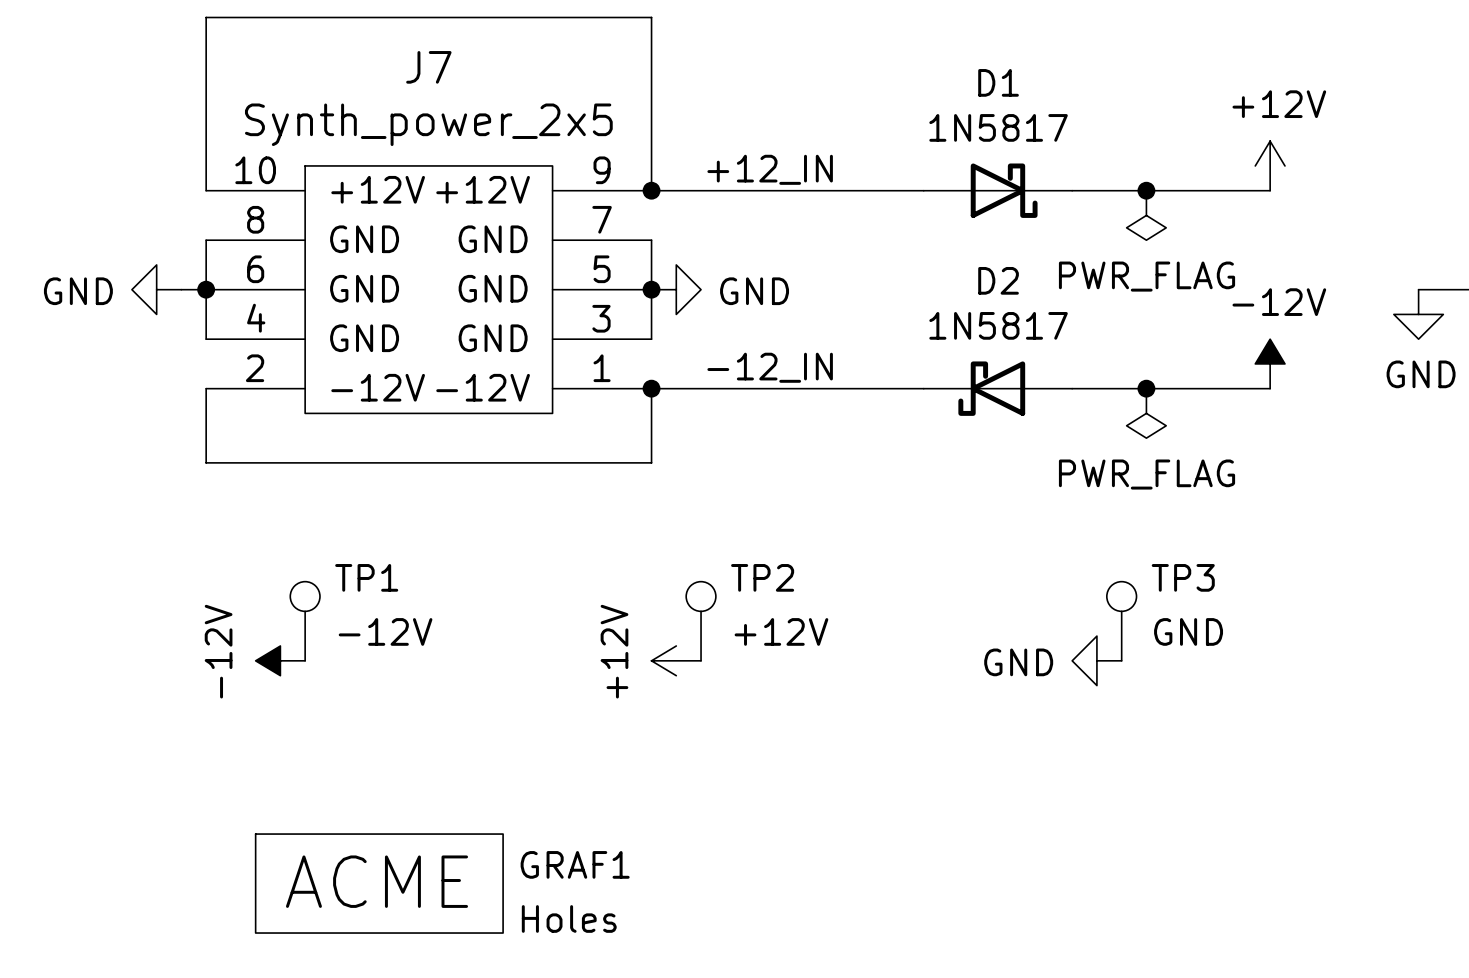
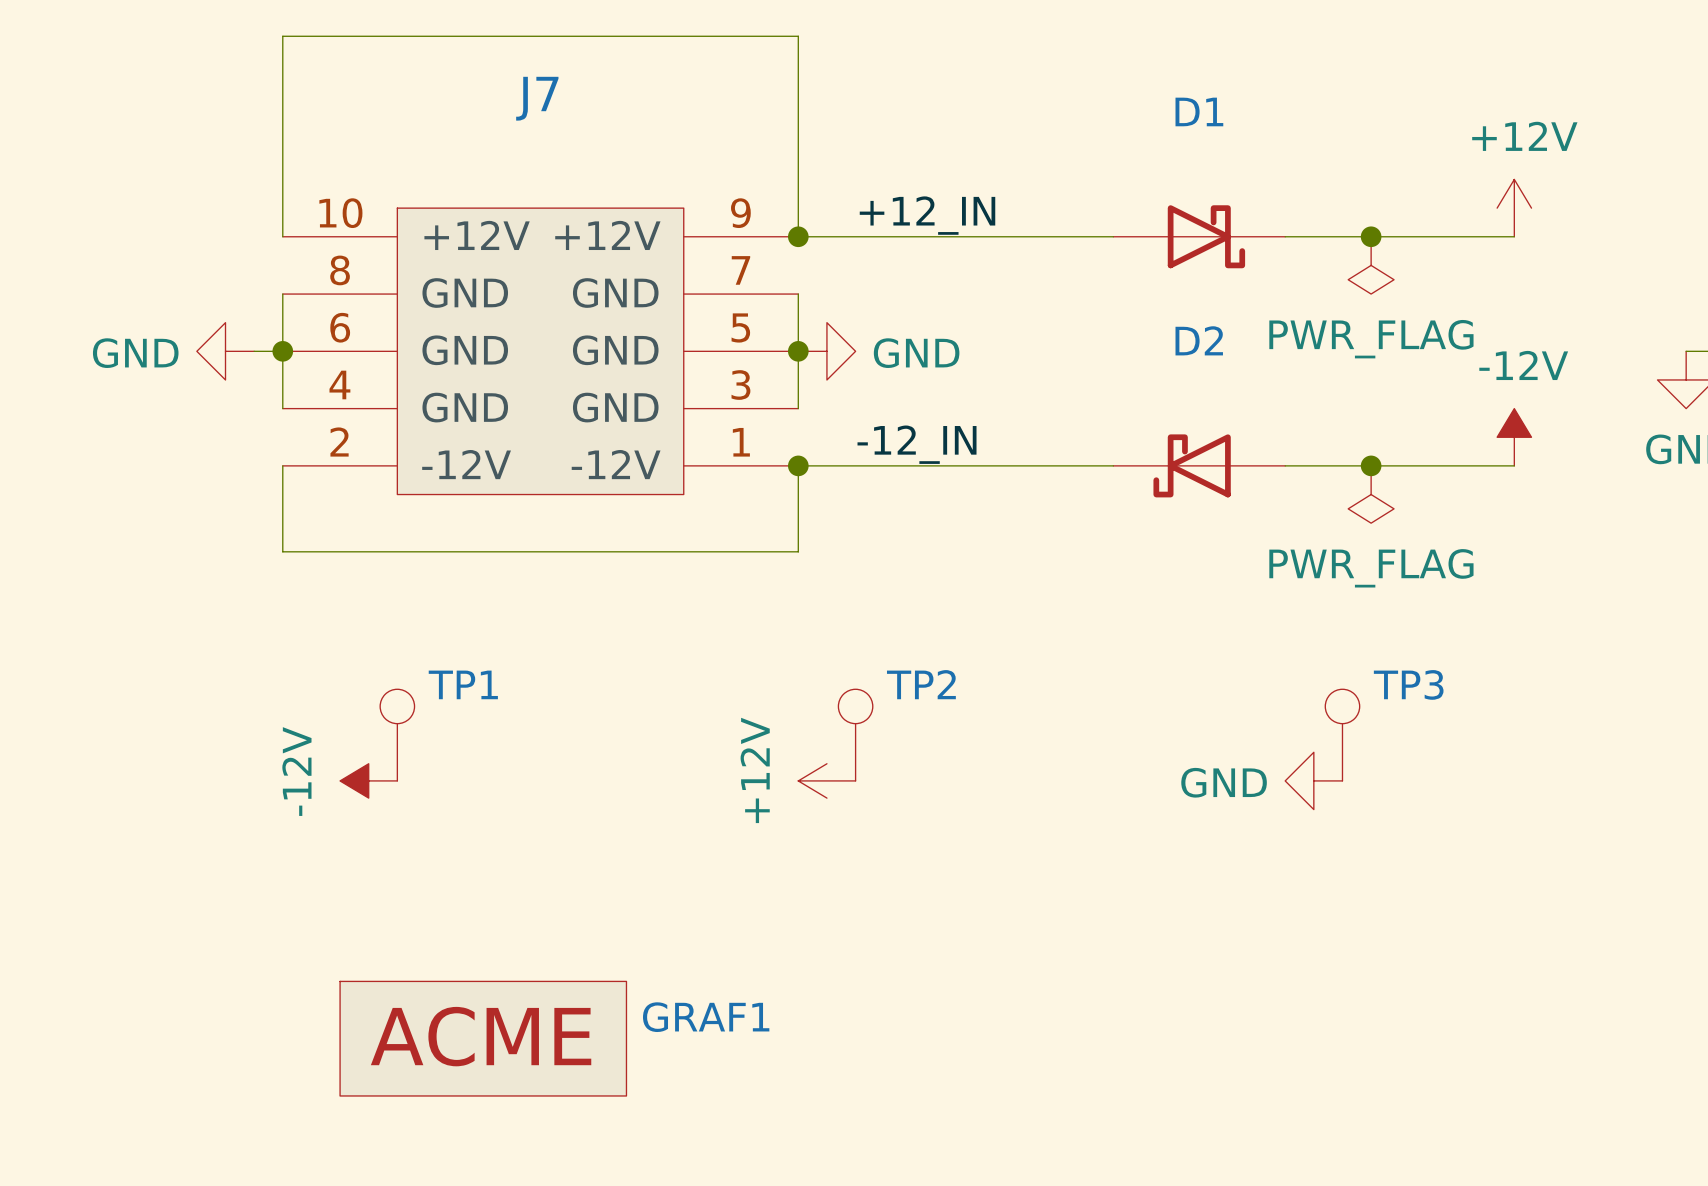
J7 value: Synth_power_2x5 (428, 124) -> none
D1 value: 1N5817 (998, 127) -> none
D2 value: 1N5817 (998, 325) -> none
TP1 value: -12V (385, 631) -> none
TP2 value: +12V (781, 631) -> none
TP3 value: GND (1188, 631) -> none
GRAF1 value: Holes (569, 918) -> none

